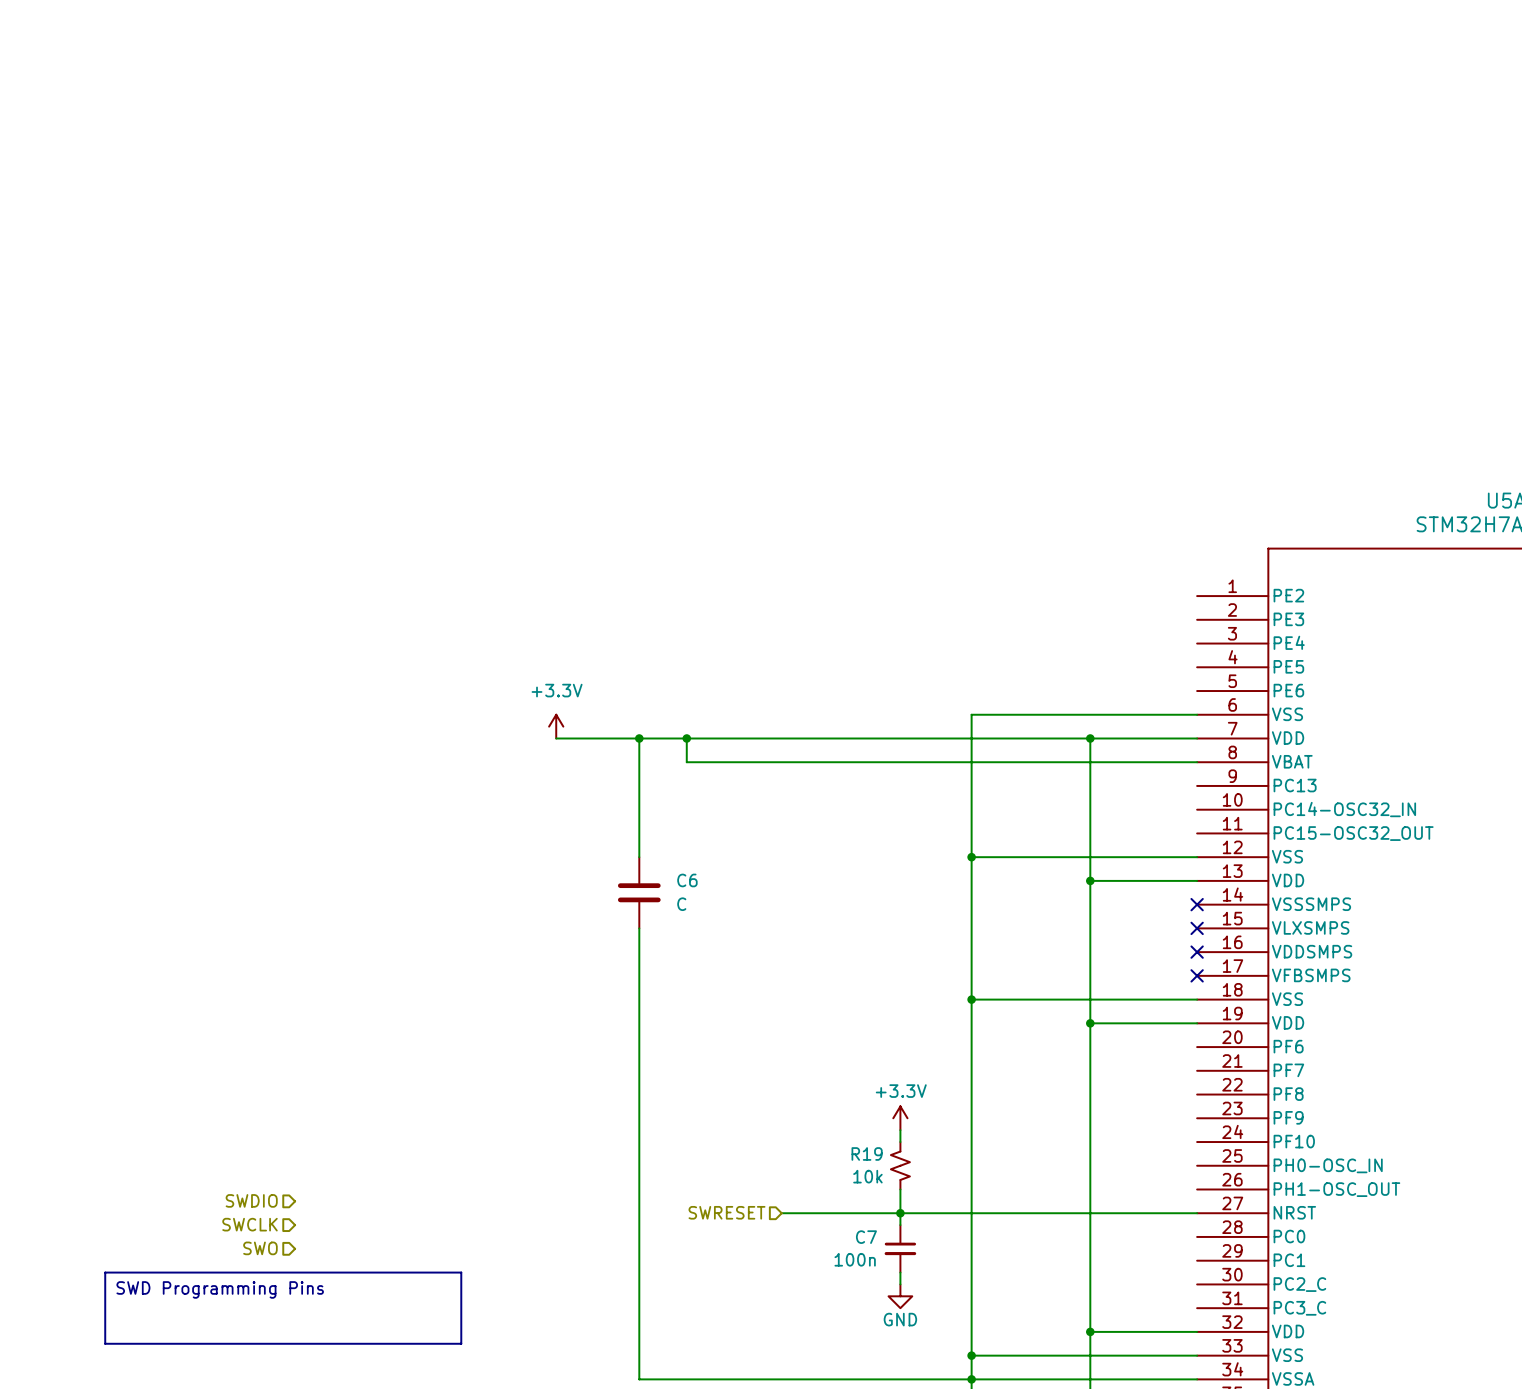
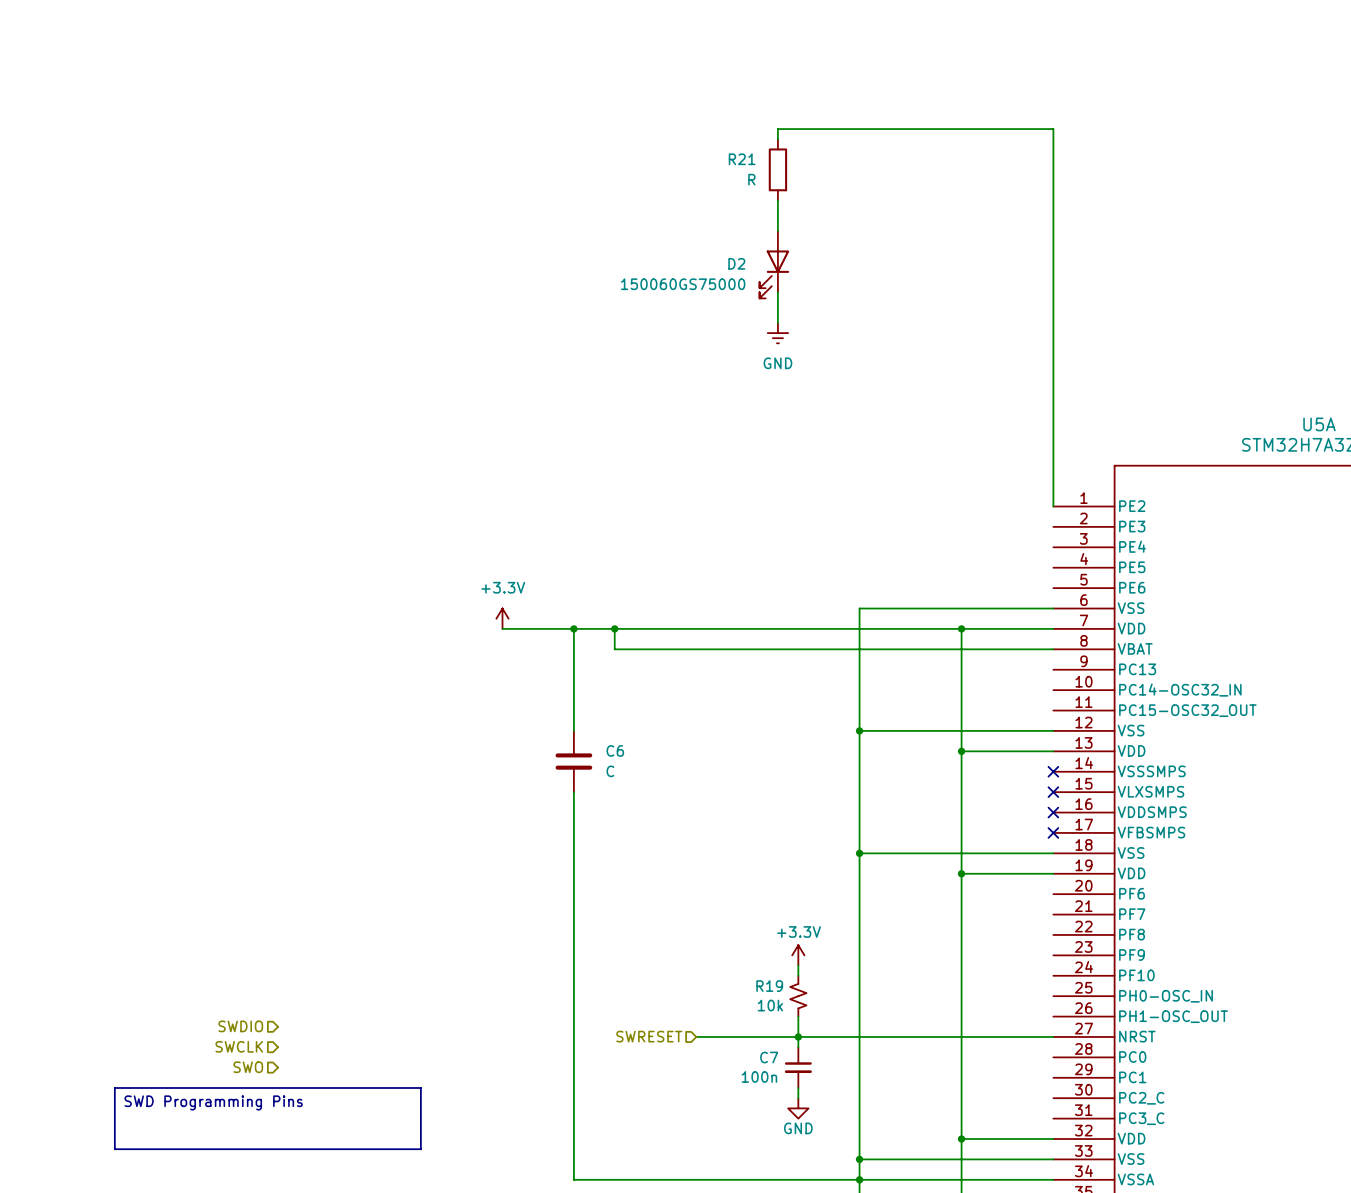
wire: none -> (777, 139) (777, 129) (1053, 129) (1053, 506)
R21: none -> R (777, 169)
wire: none -> (777, 200) (777, 231)
D2: none -> 150060GS75000 (774, 264)
wire: none -> (777, 292) (777, 322)
power symbol: none -> GND (777, 333)

